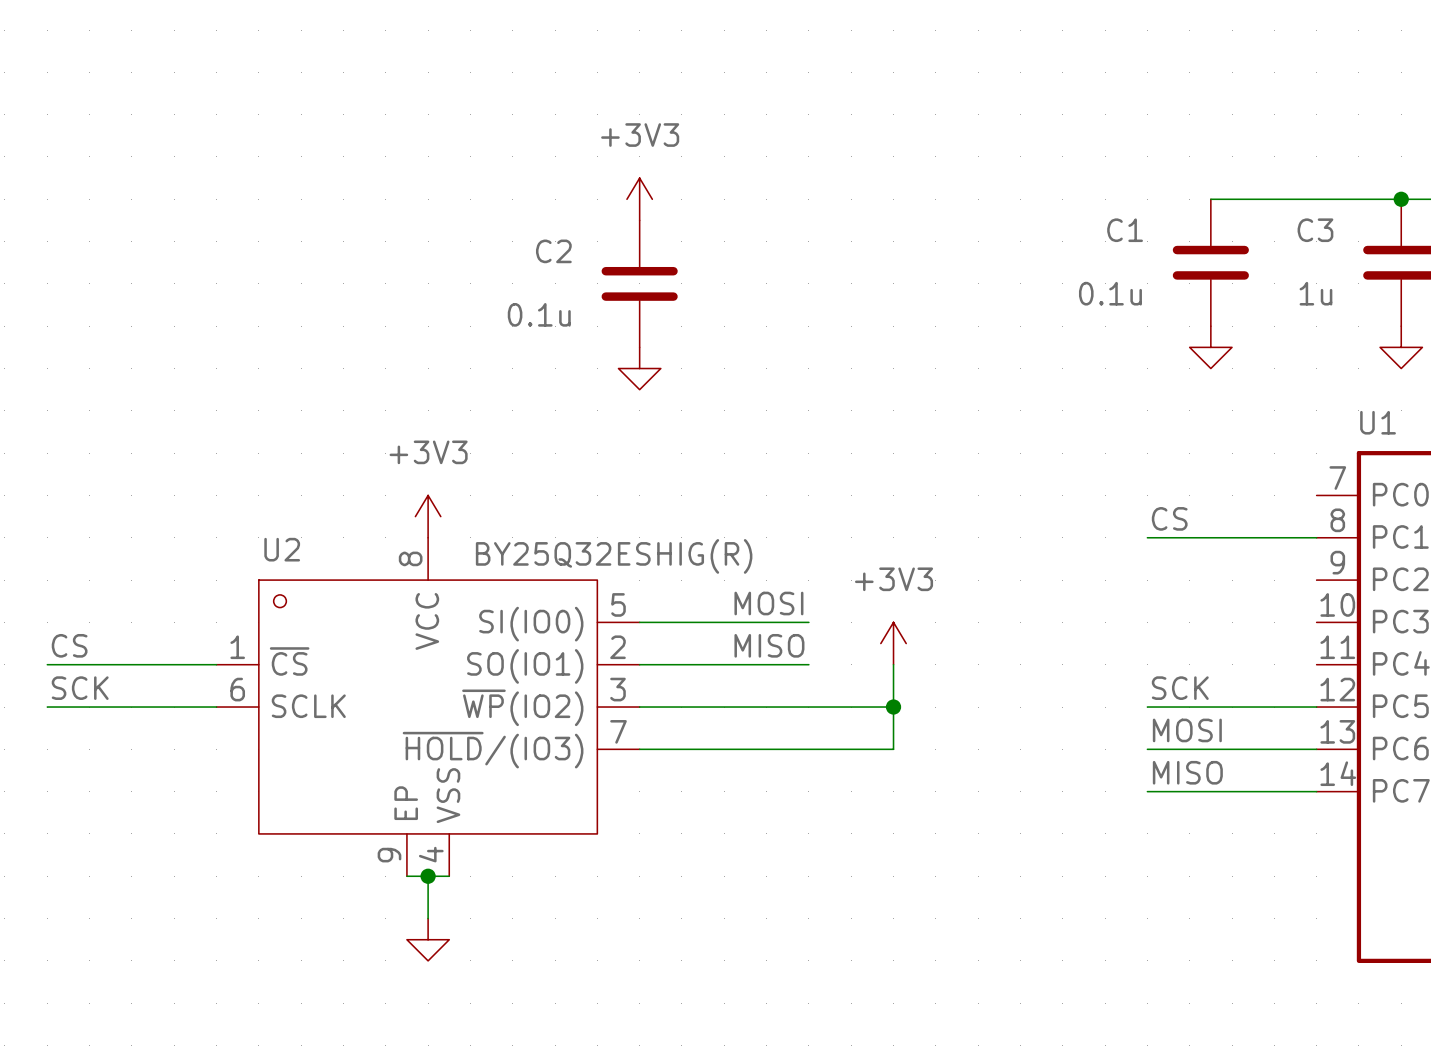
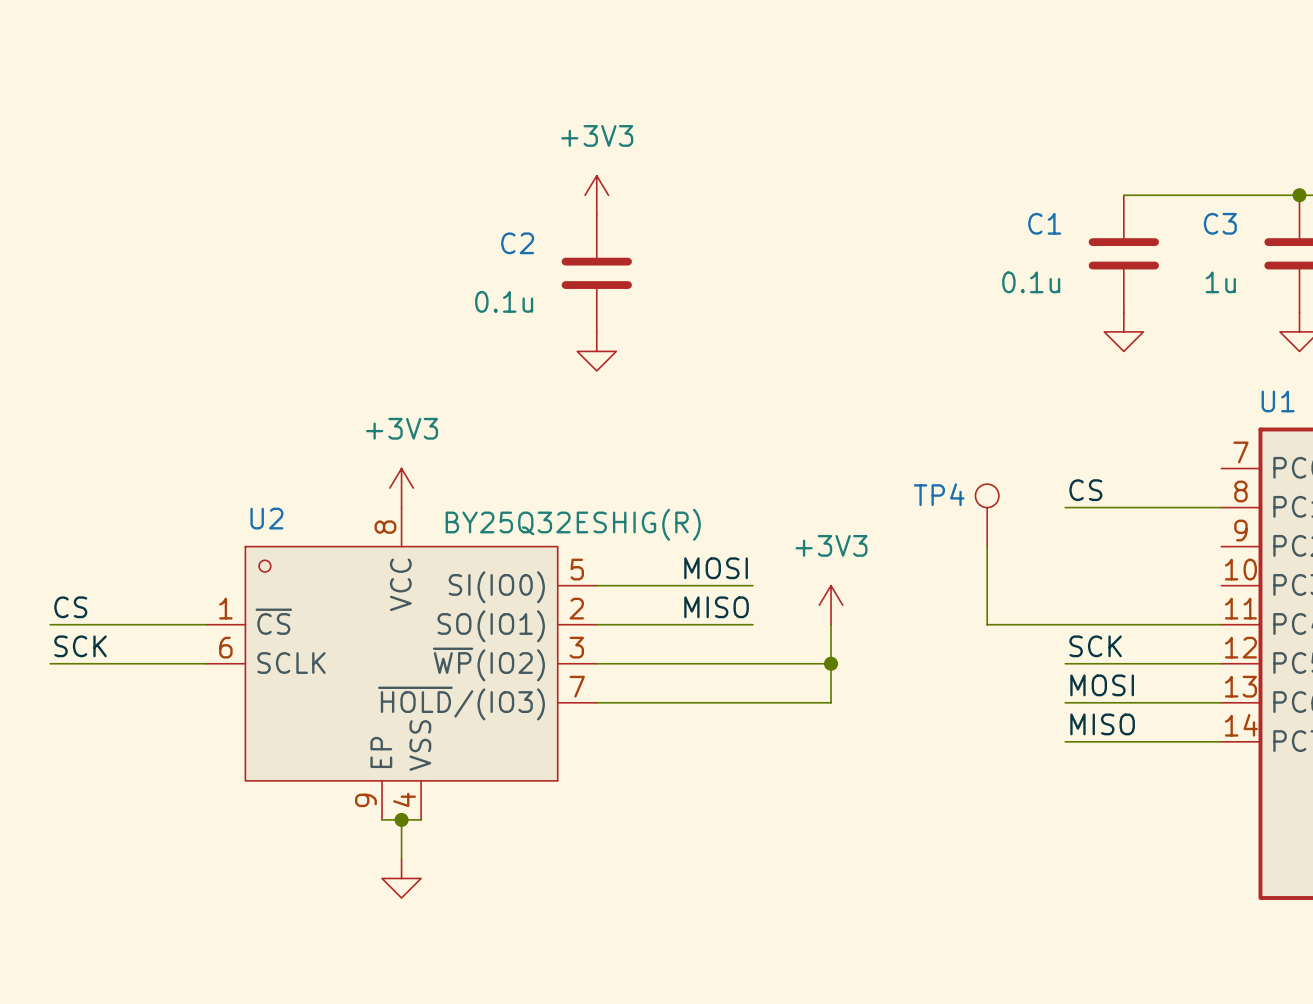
TP4: none -> (987, 515)
wire: none -> (987, 546) (987, 624) (1221, 624)

